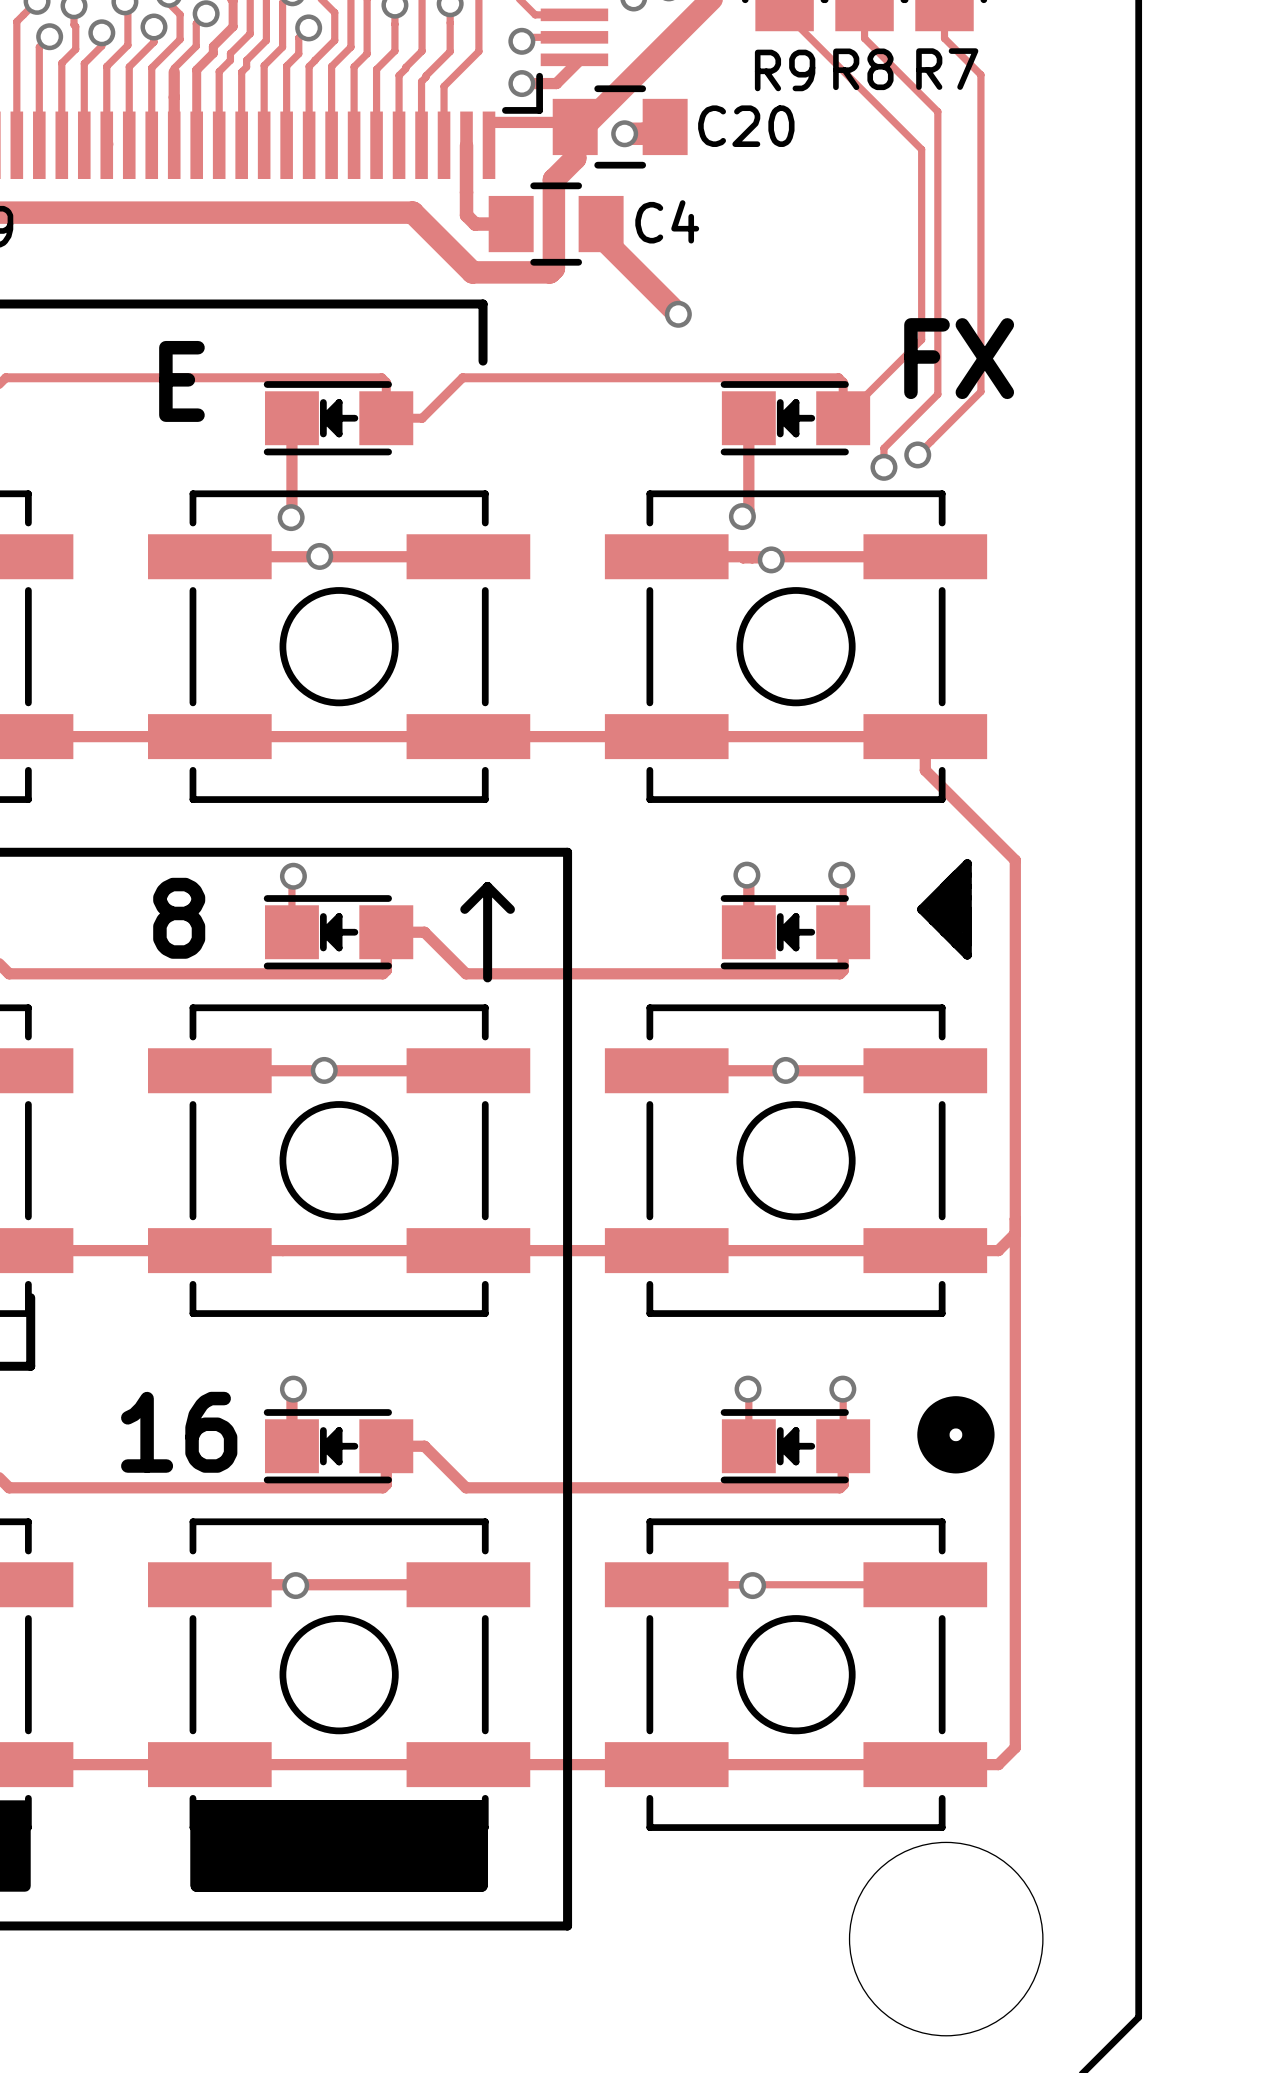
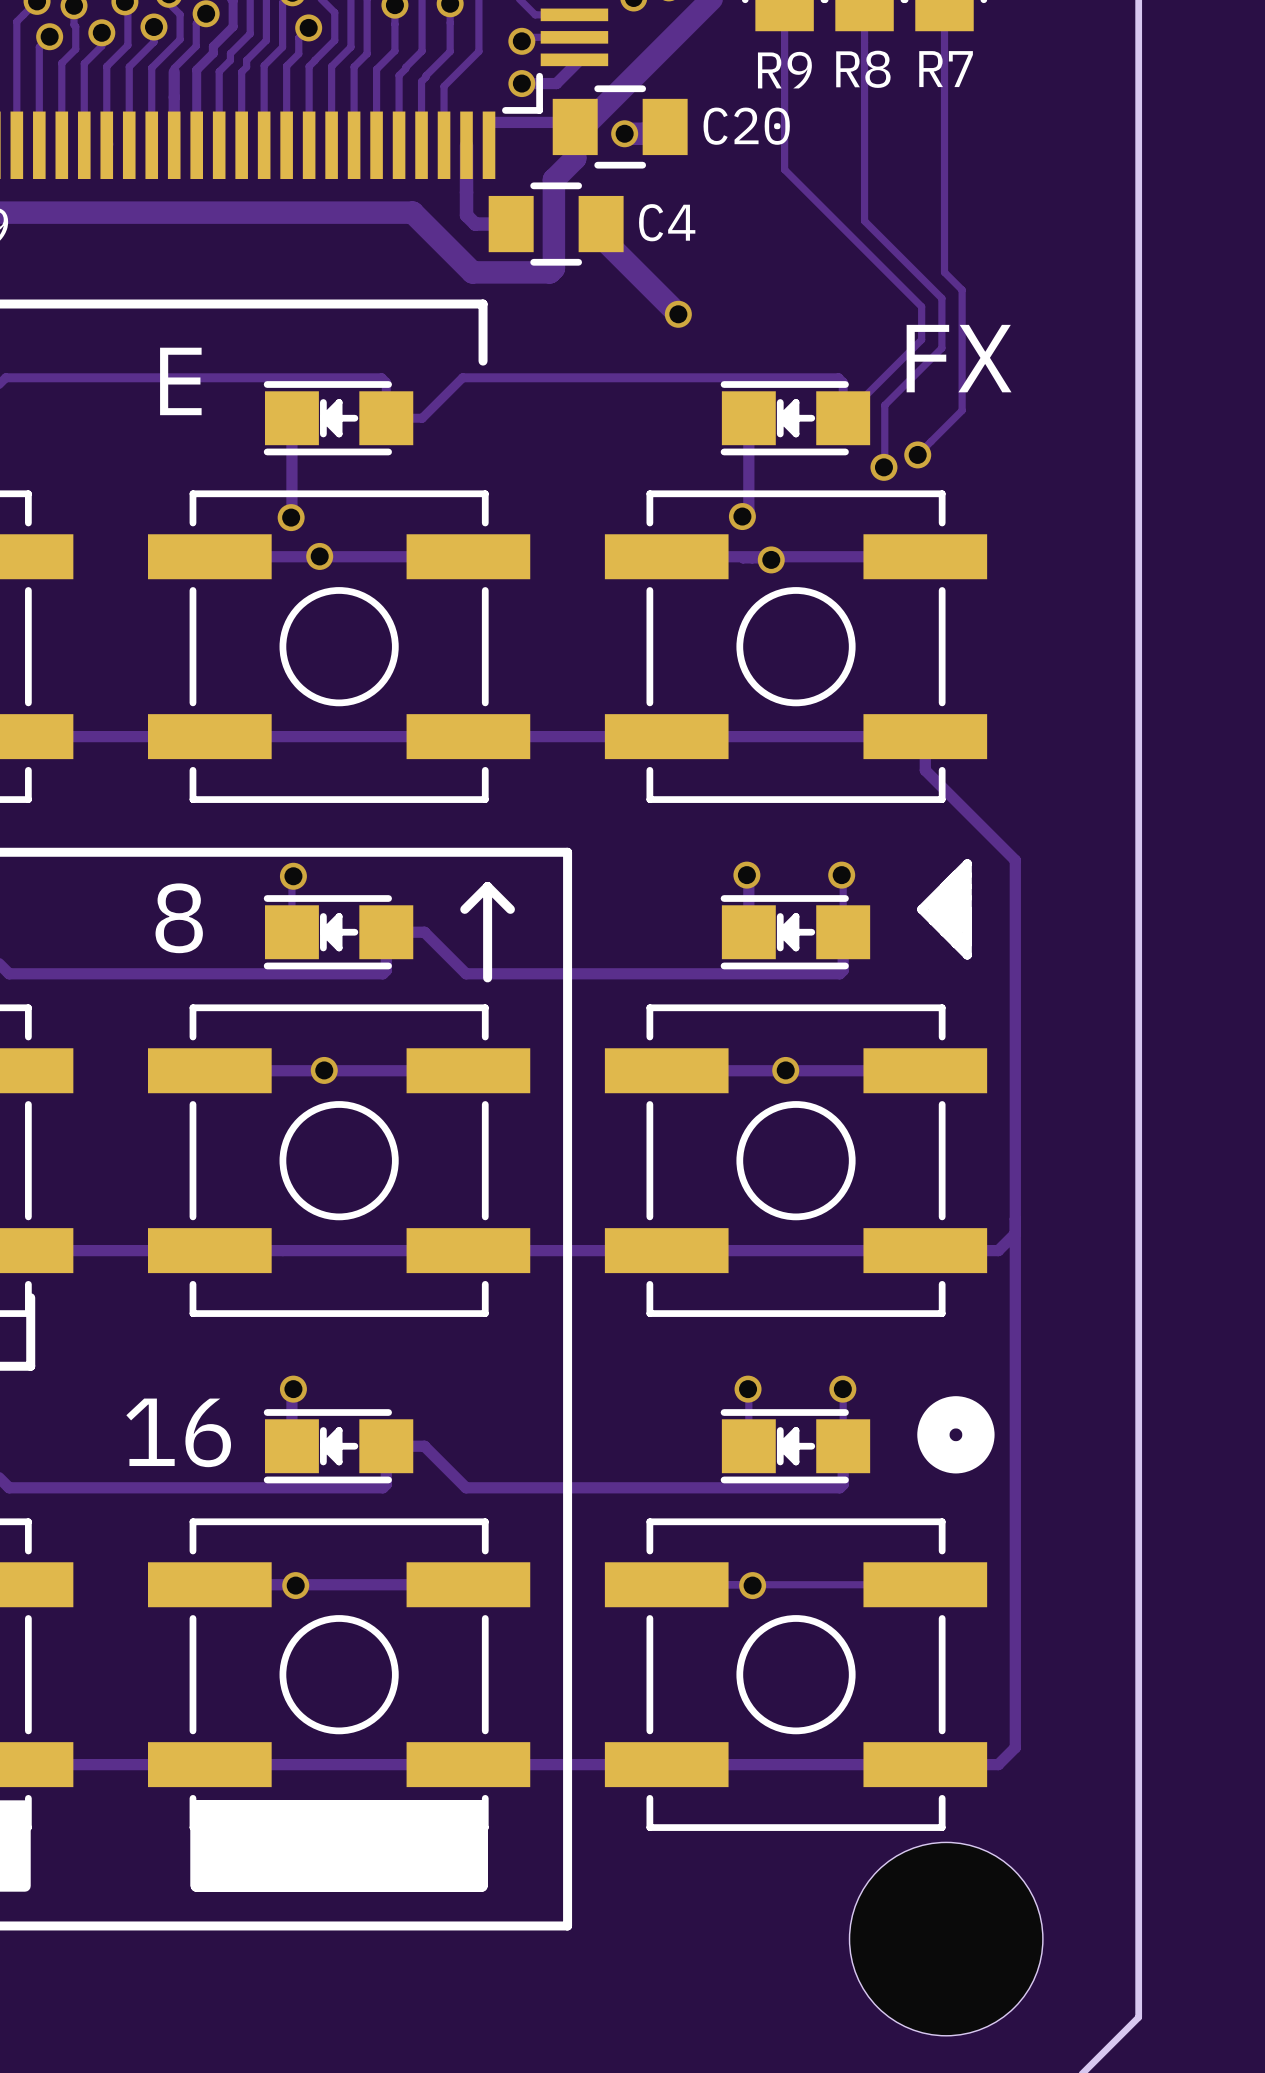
track: (784, 15) (787, 15) (921, 149) (921, 306) -> (784, 15) (784, 169) (921, 306)
track: (864, 38) (937, 111) (937, 394) (883, 448) (883, 467) -> (864, 38) (864, 221) (941, 298) (941, 348) (884, 405) (883, 467)
track: (944, 38) (980, 74) (980, 391) (962, 410) -> (944, 38) (944, 272) (962, 290) (962, 410)

